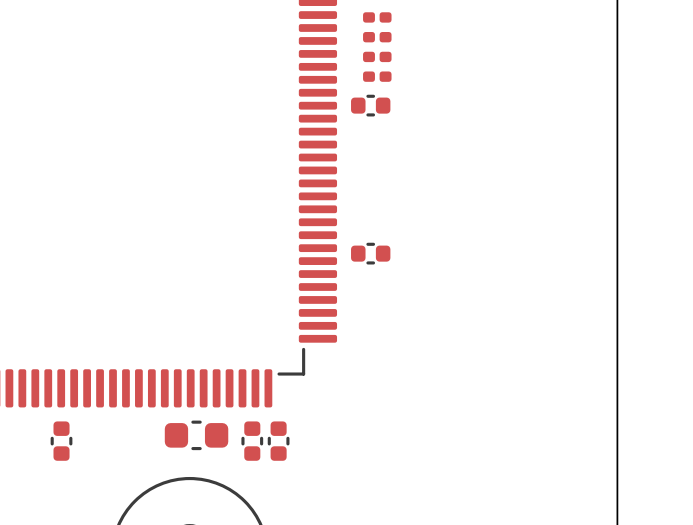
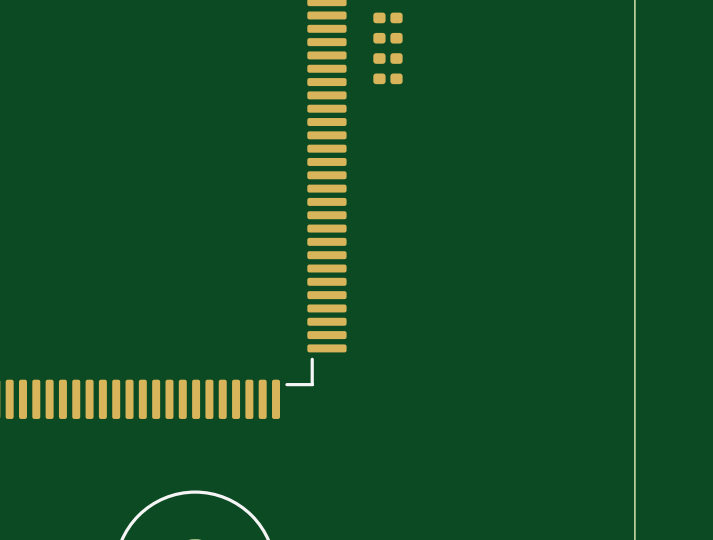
part: (370, 105) -> none
part: (370, 253) -> none
part: (196, 435) -> none
part: (61, 441) -> none
part: (252, 441) -> none
part: (278, 441) -> none

